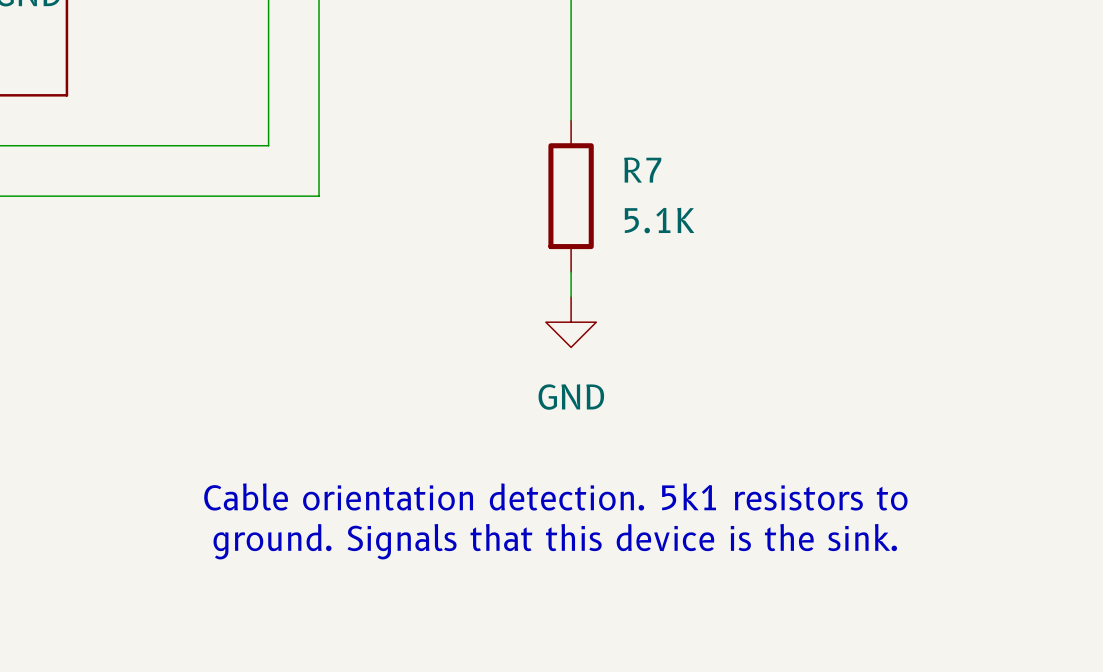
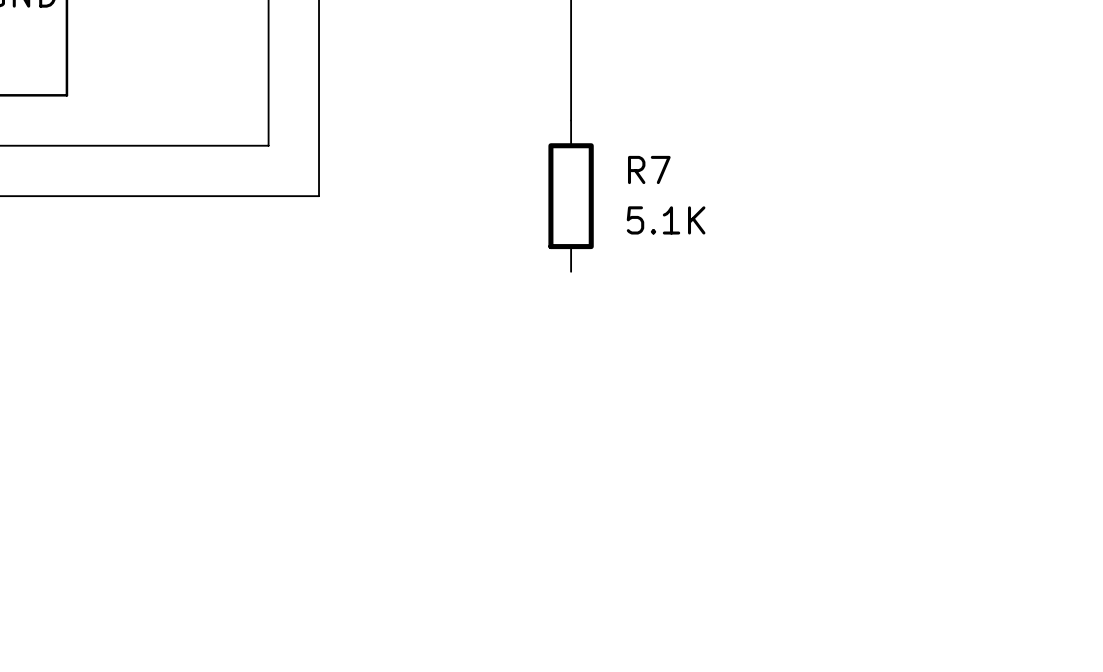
wire: (571, 271) (571, 296) -> none
power symbol: GND (571, 322) -> none
text: Cable orientation detection. 5k1 resistors to (555, 496) -> none
text: ground. Signals that this device is the sink. (555, 541) -> none

